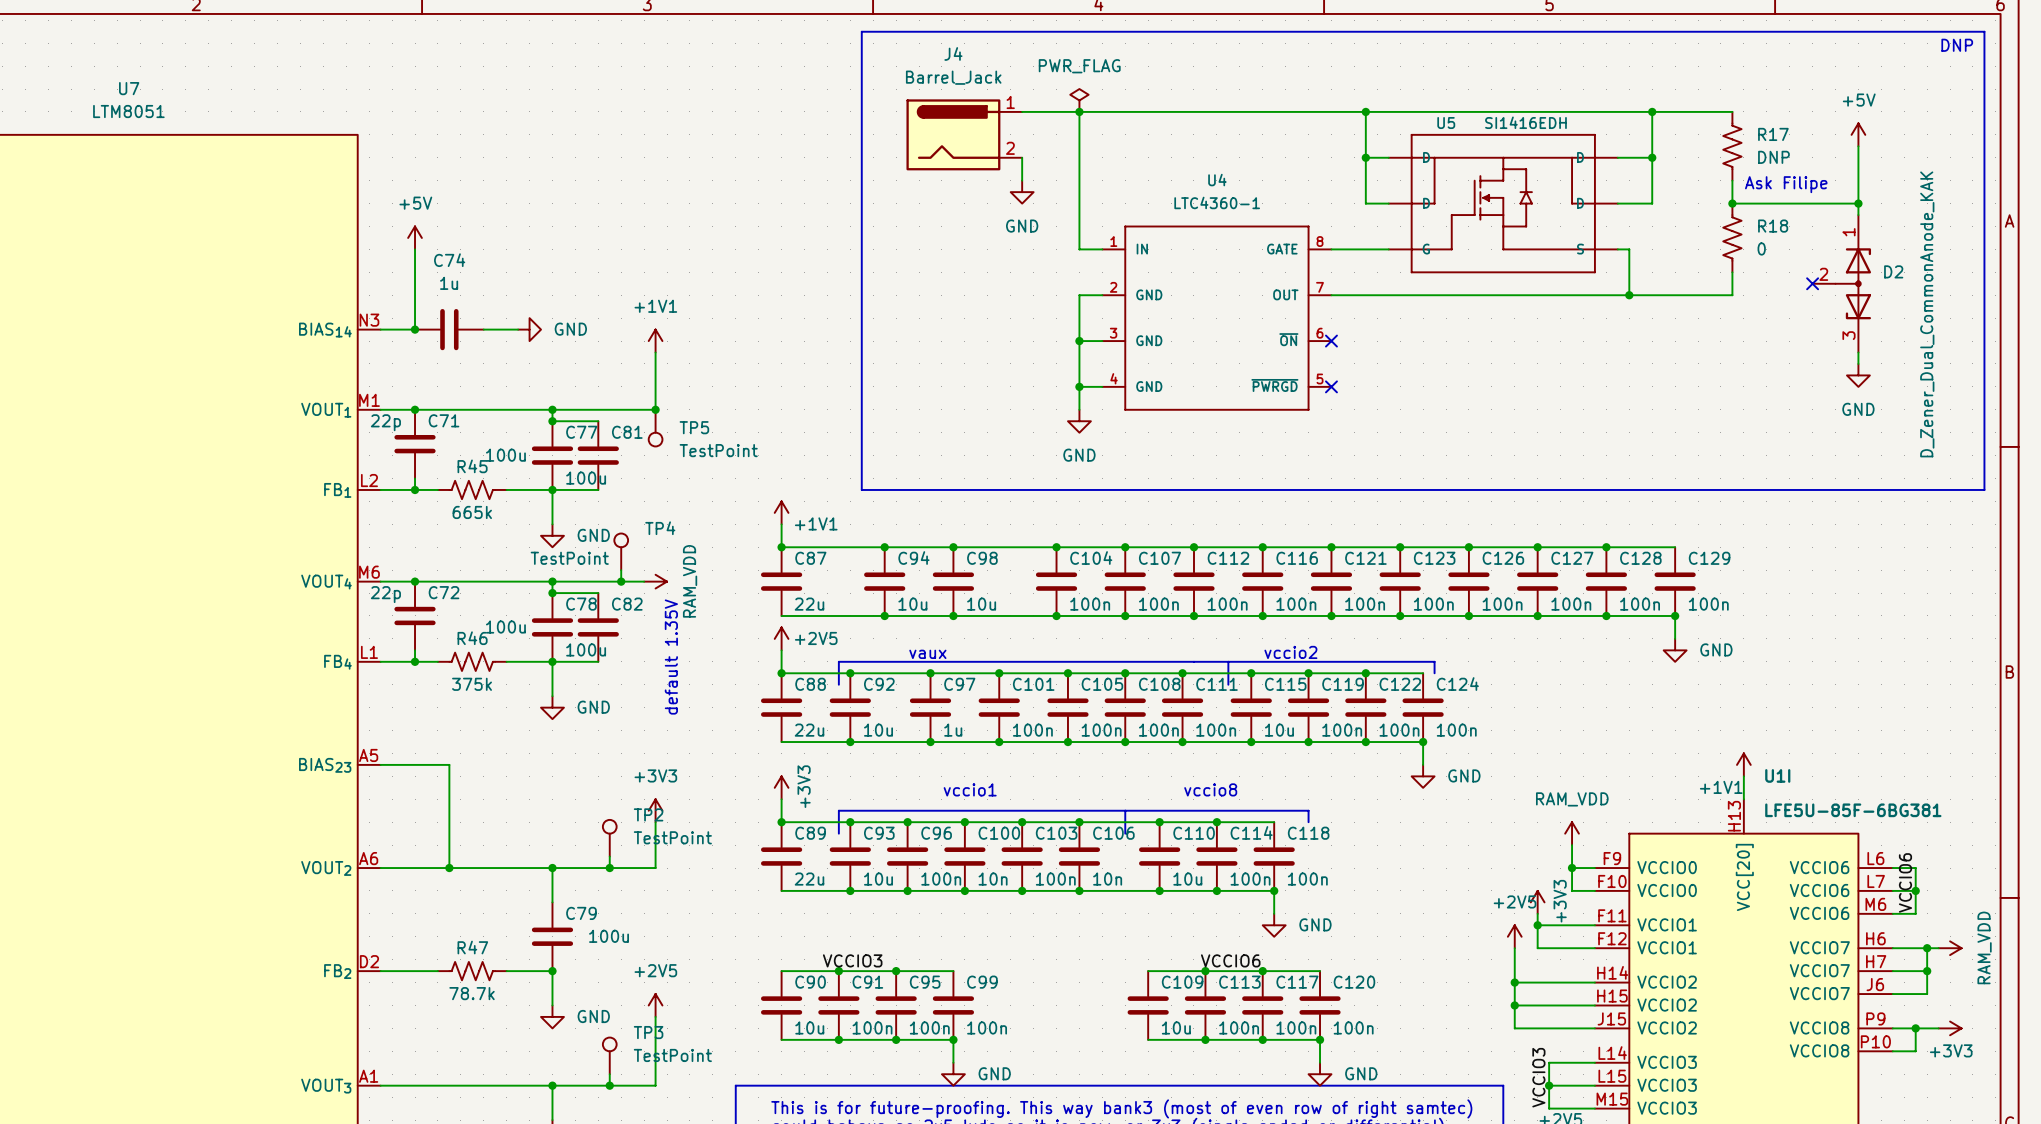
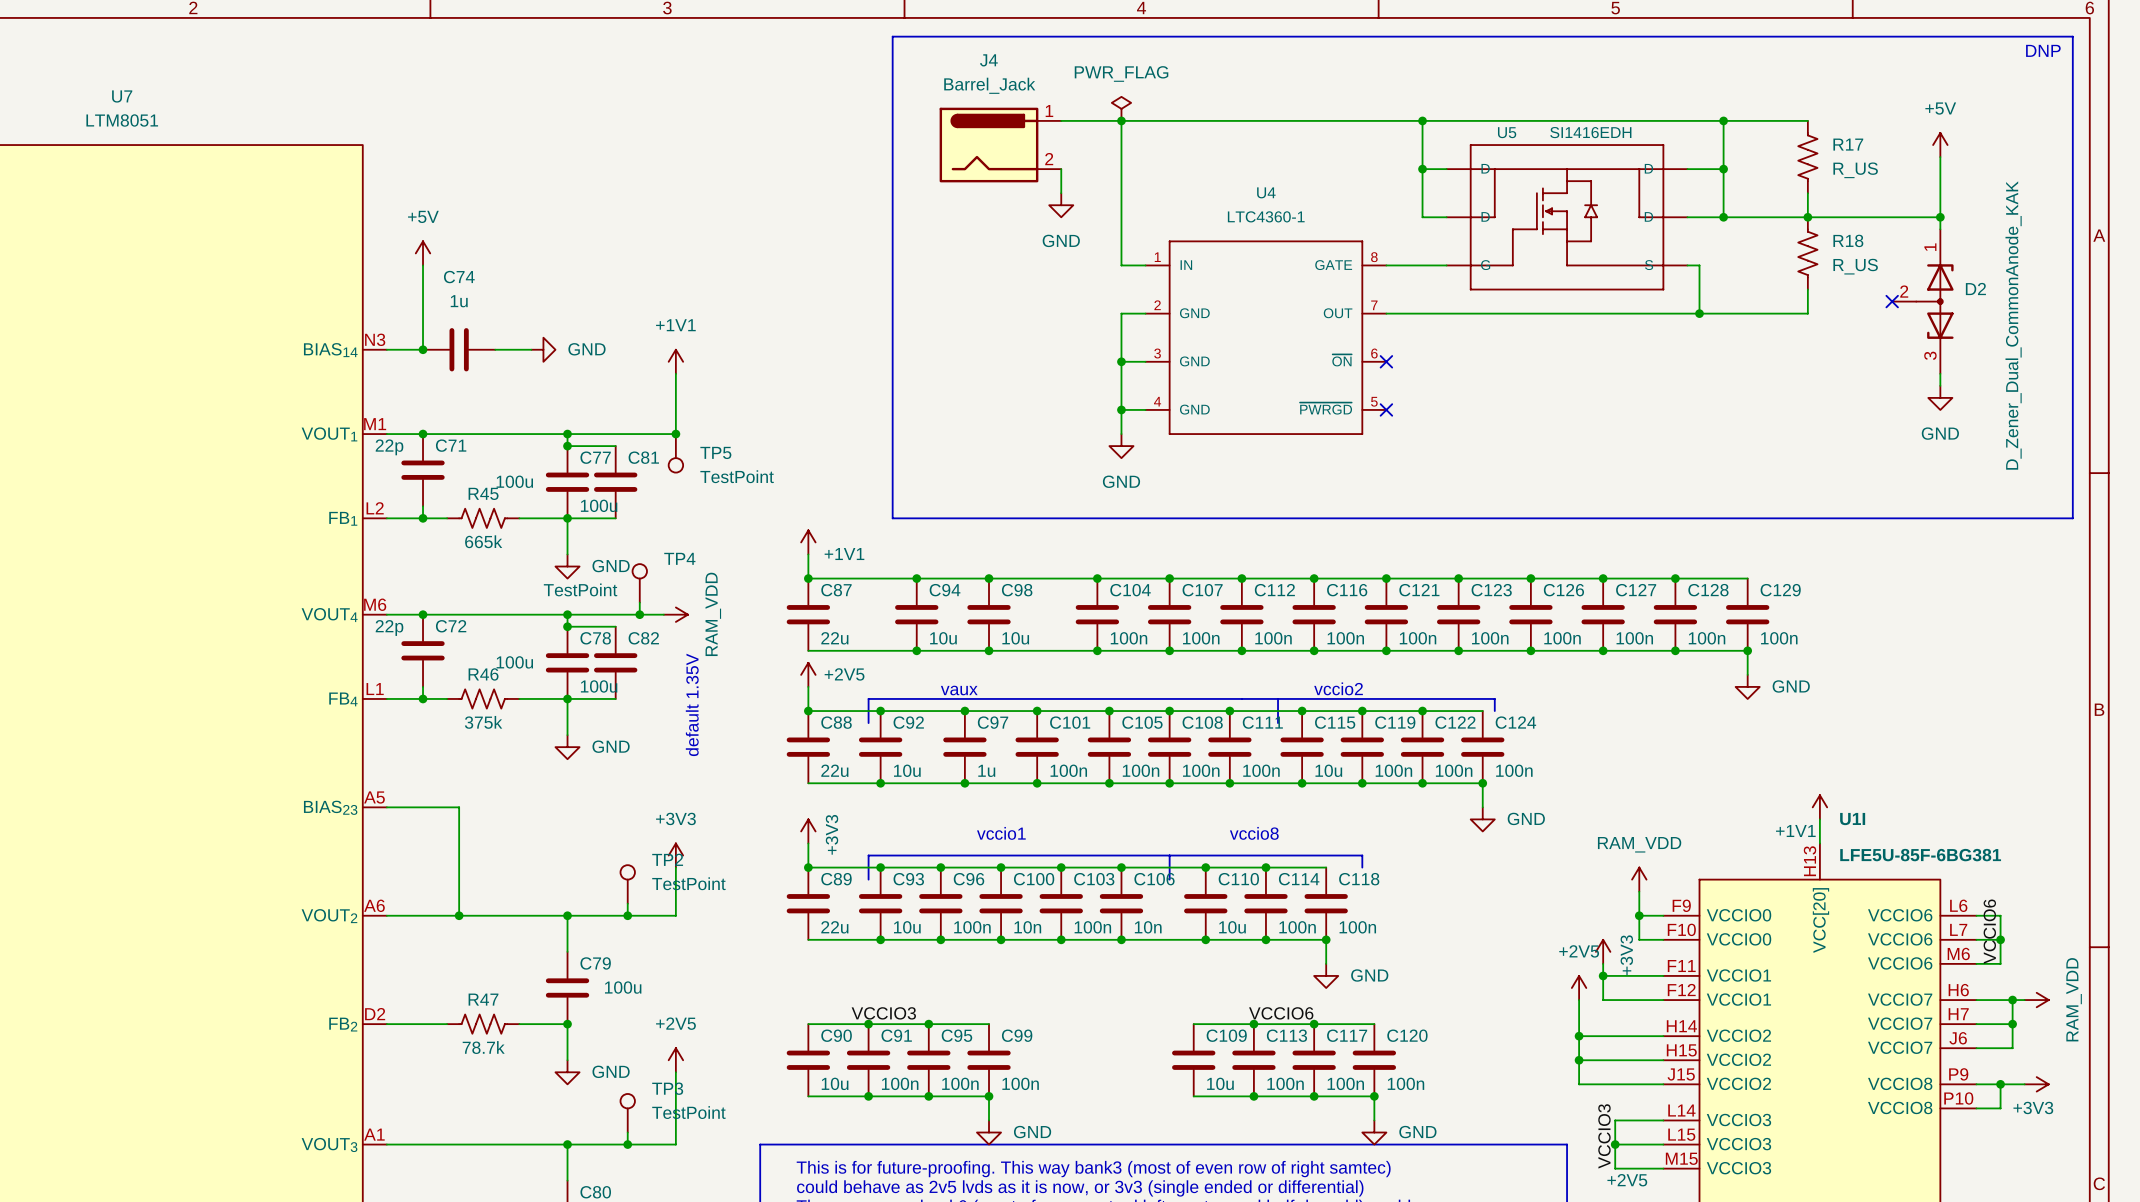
R17 value: DNP (1773, 157) -> R_US (1855, 170)
text: Ask Filipe (1786, 184) -> none
wire: none -> (1723, 217) (1807, 217)
junction: none -> (1723, 217)
R18 value: 0 (1761, 248) -> R_US (1855, 266)

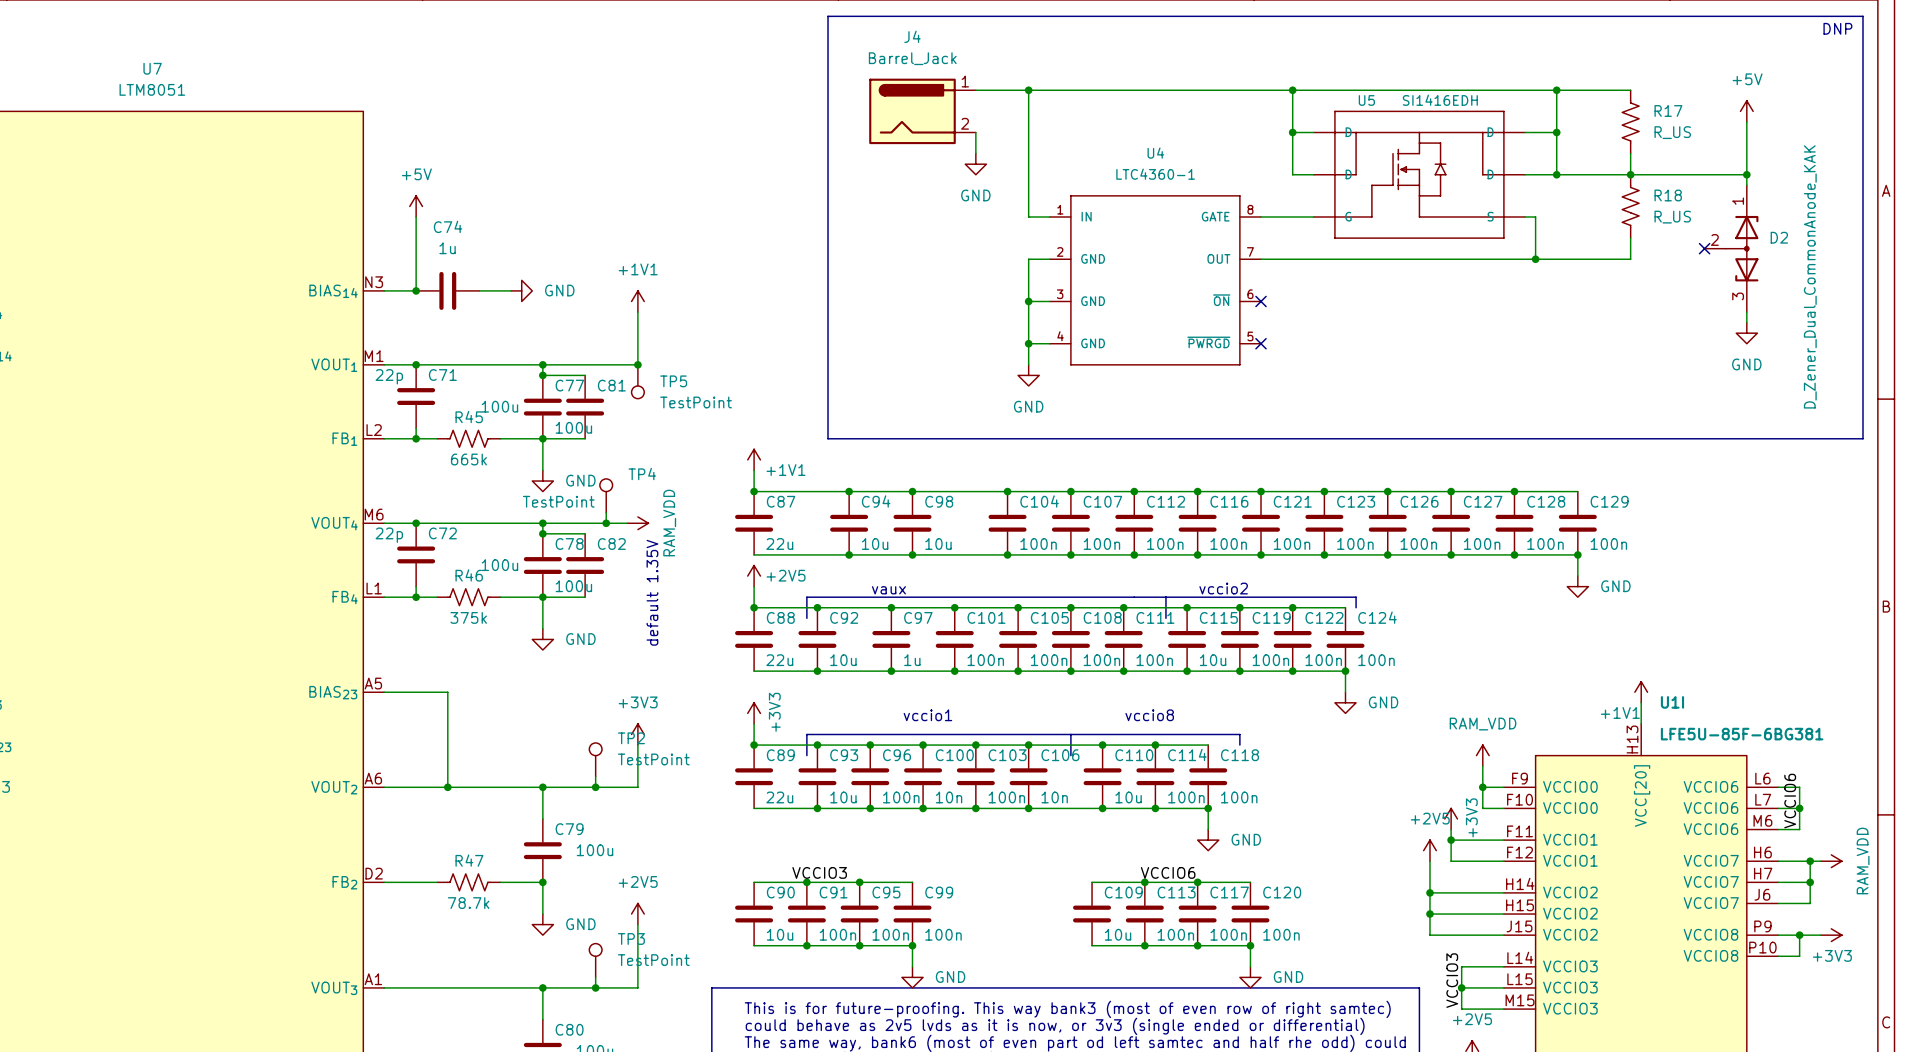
power symbol: PWR_FLAG (1121, 108) -> none

